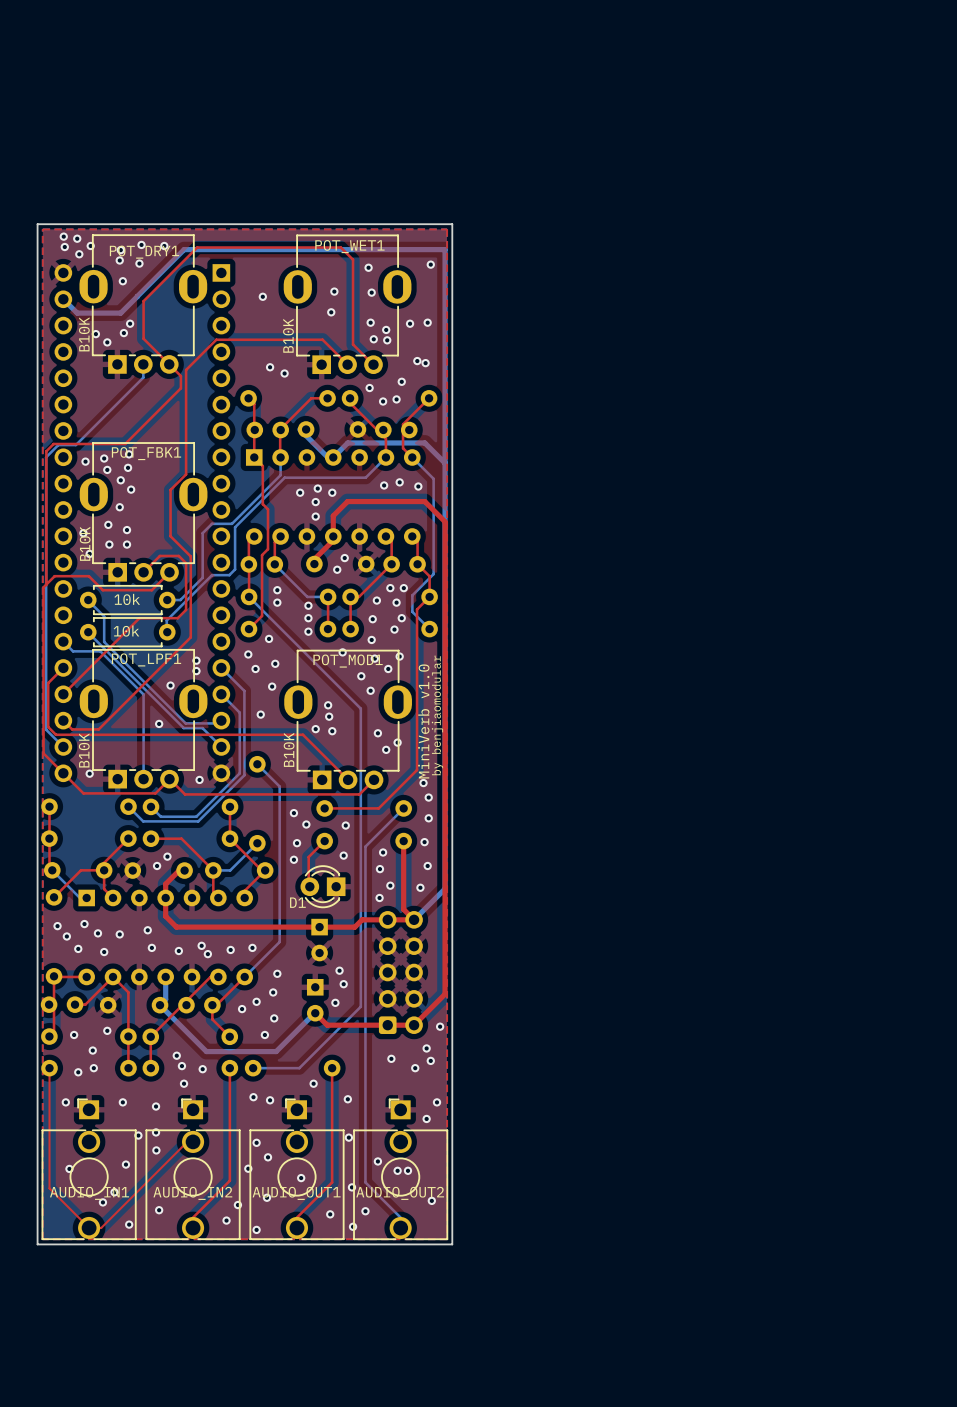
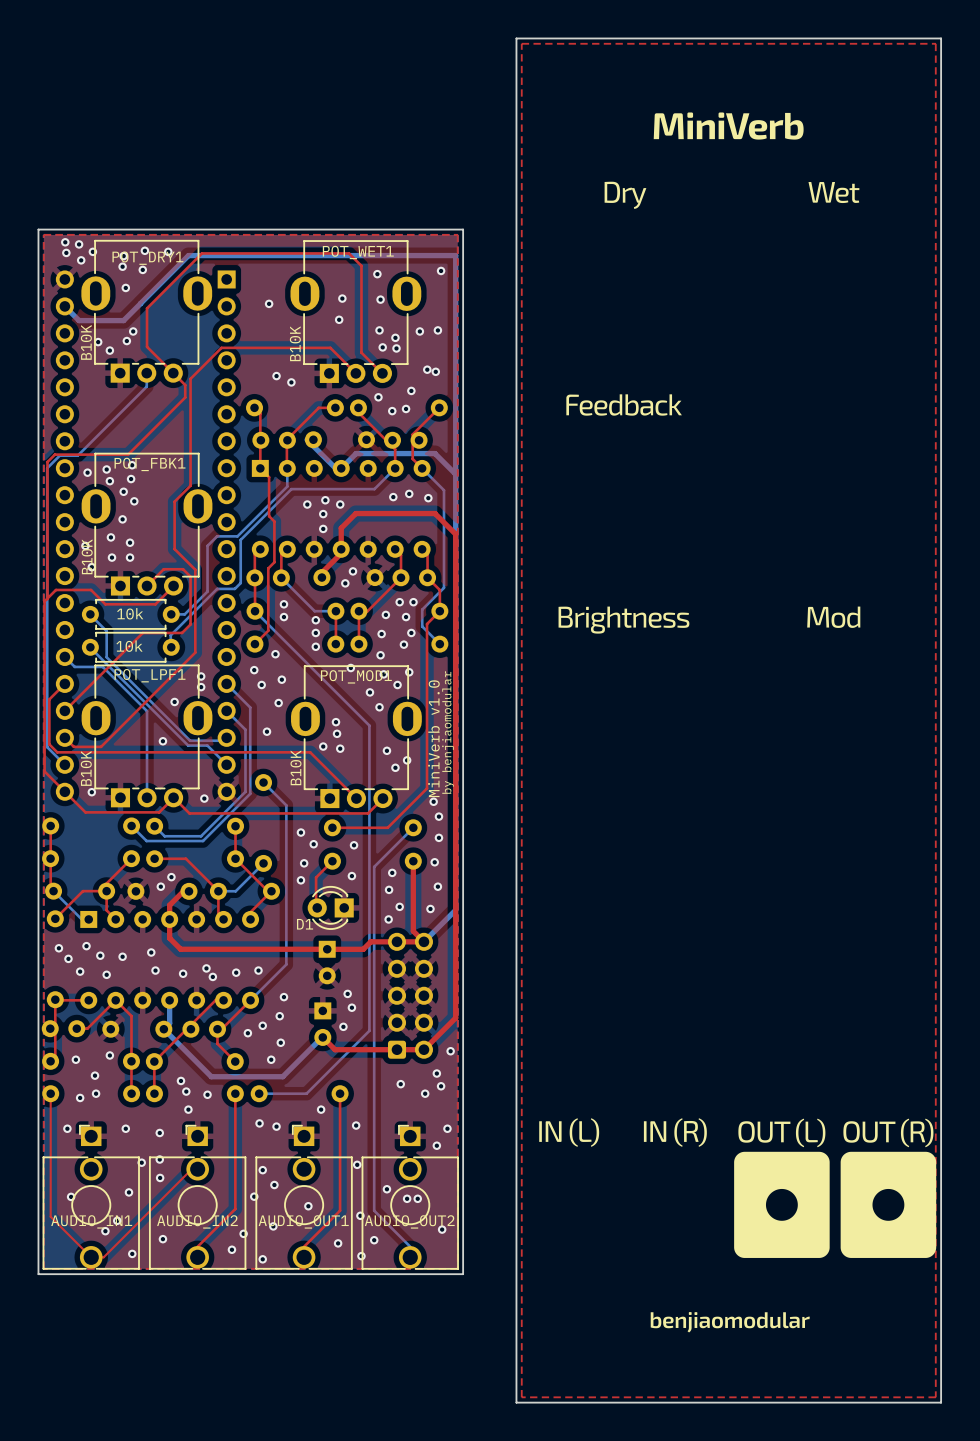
board edge: none -> (516, 38) (516, 1402) (941, 1402) (941, 38) (516, 38)
top zone outline: none -> (521, 43) (521, 1397) (935, 1397) (935, 43) (521, 43)
drawing: none -> [653, 112, 804, 140]
drawing: none -> [604, 181, 647, 209]
drawing: none -> [808, 182, 860, 204]
drawing: none -> [566, 394, 682, 416]
drawing: none -> [558, 606, 690, 634]
drawing: none -> [807, 606, 861, 628]
drawing: none -> [539, 1118, 600, 1147]
drawing: none -> [643, 1118, 707, 1147]
drawing: none -> [734, 1118, 937, 1258]
drawing: none -> [650, 1312, 810, 1333]

